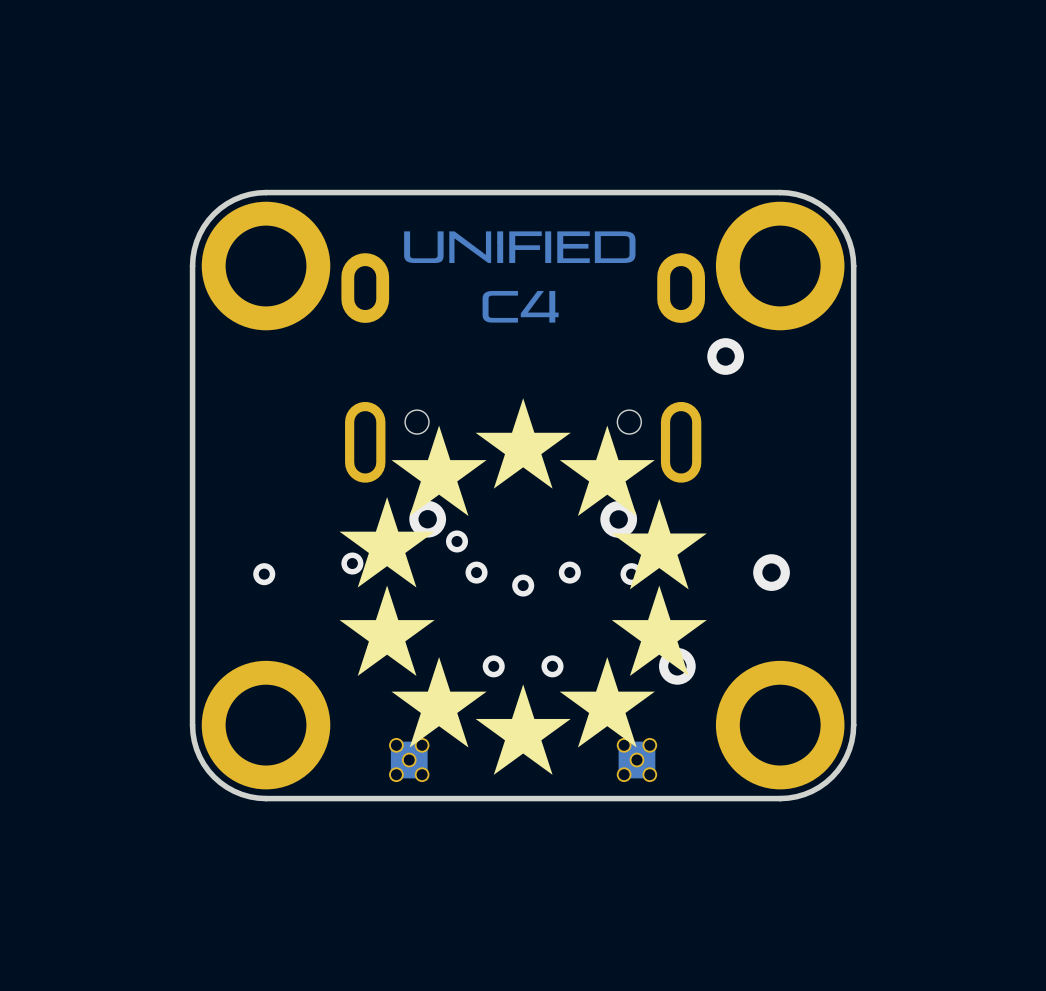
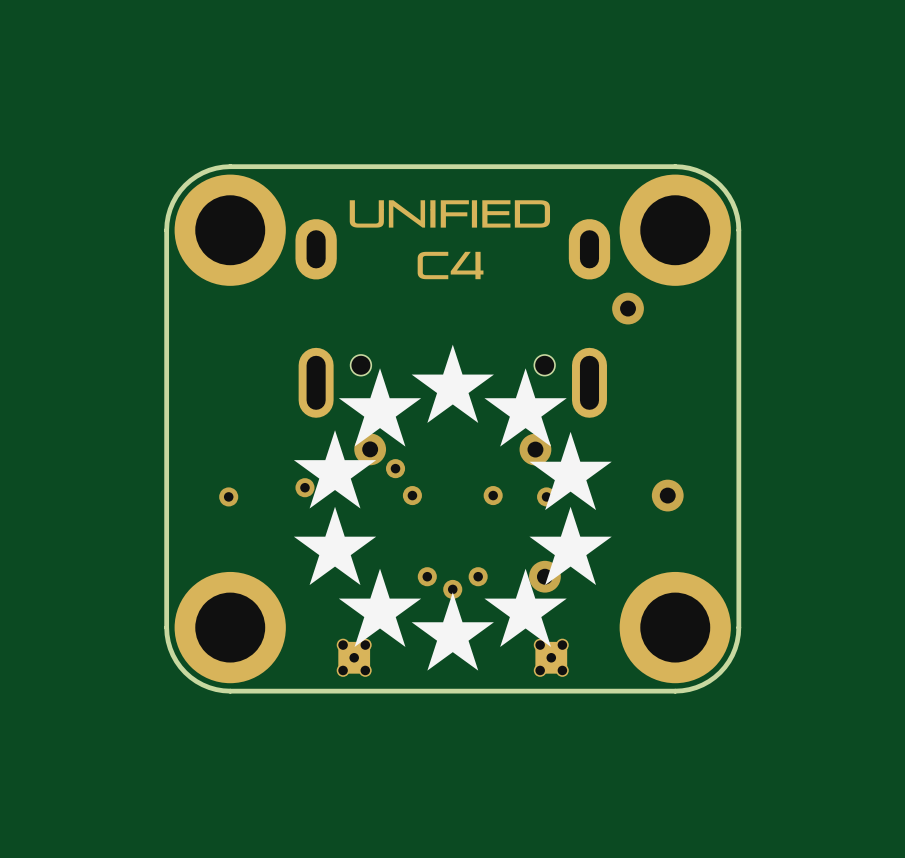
via position: (523, 585) -> (452, 589)
via position: (677, 666) -> (544, 576)

